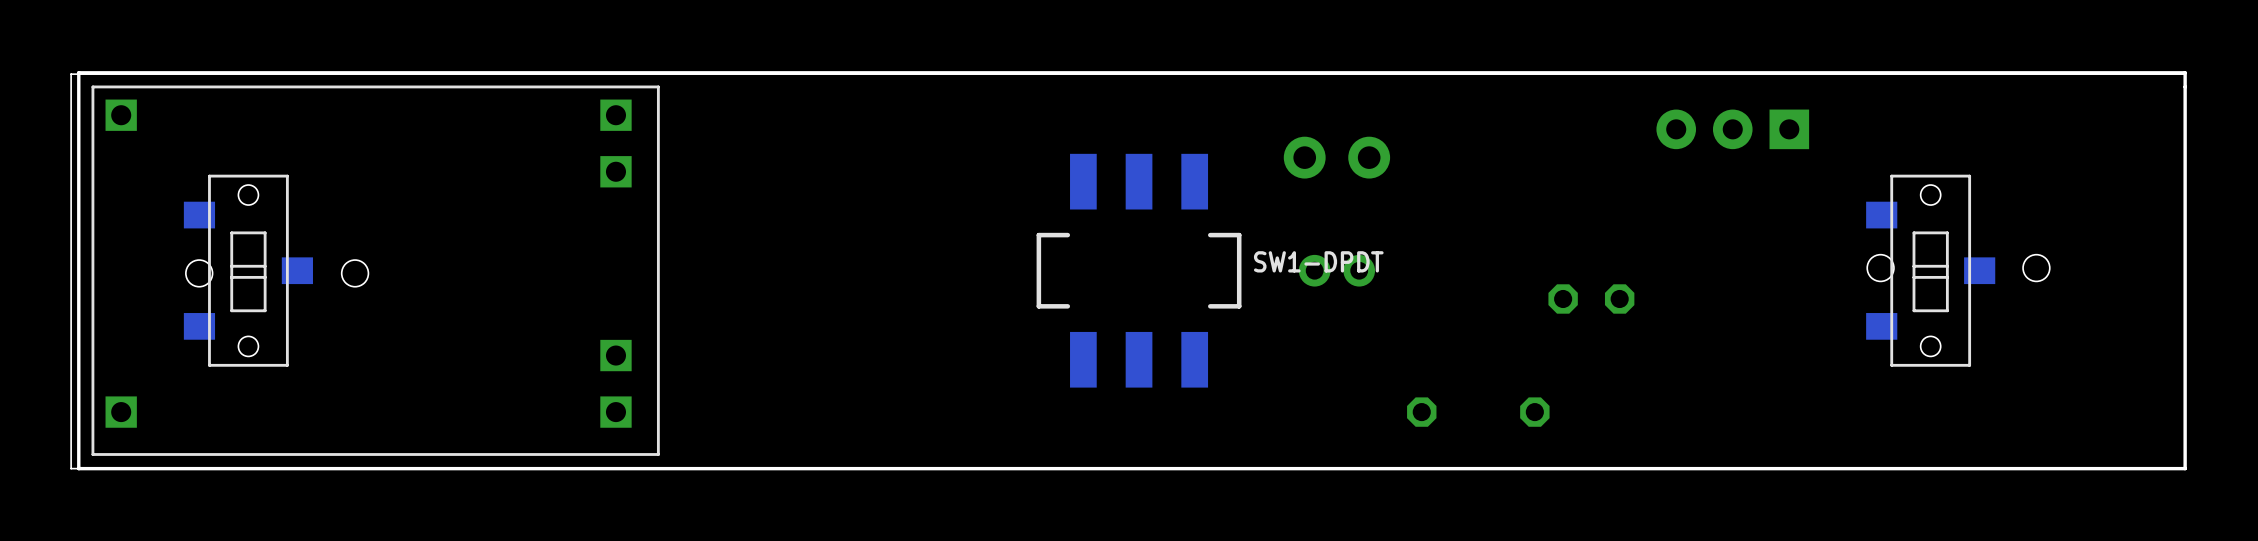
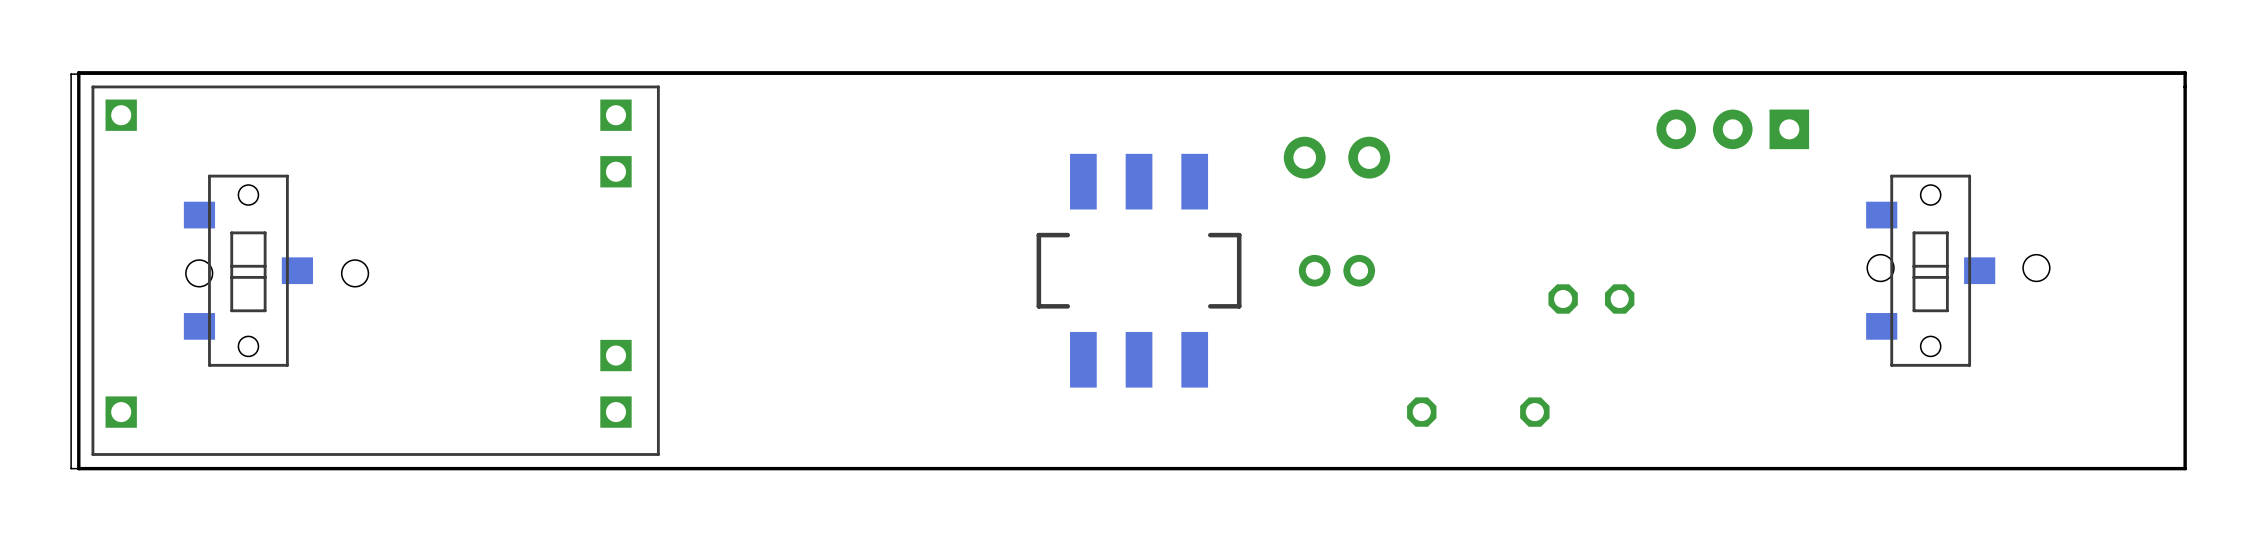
SW1-DPDT name: SW1-DPDT (1318, 261) -> none

